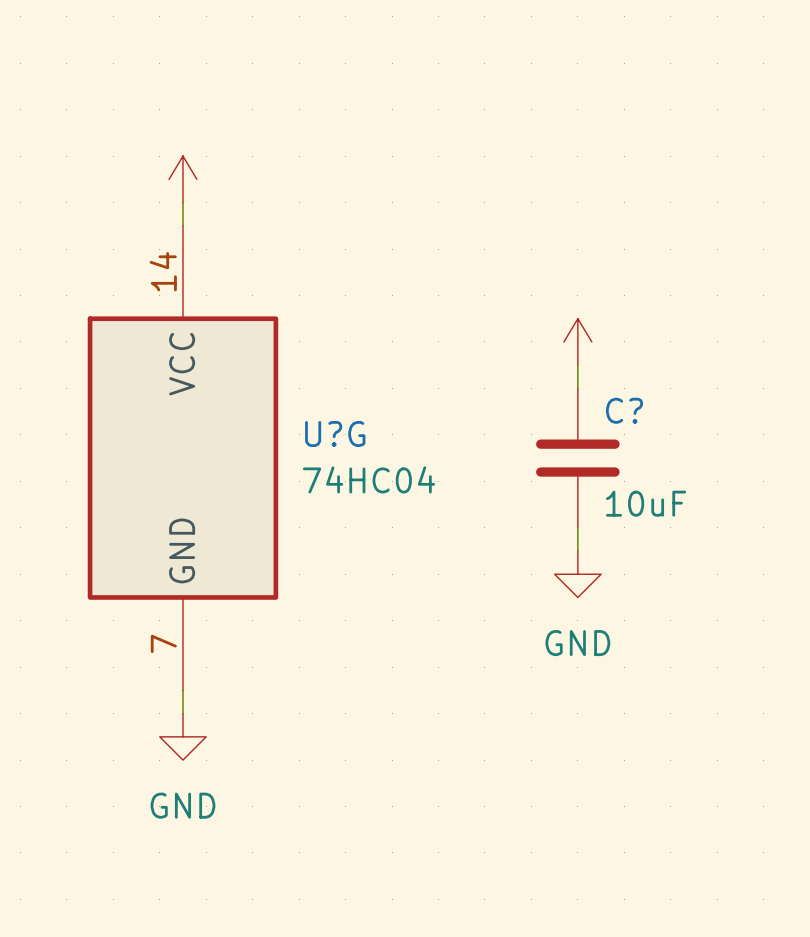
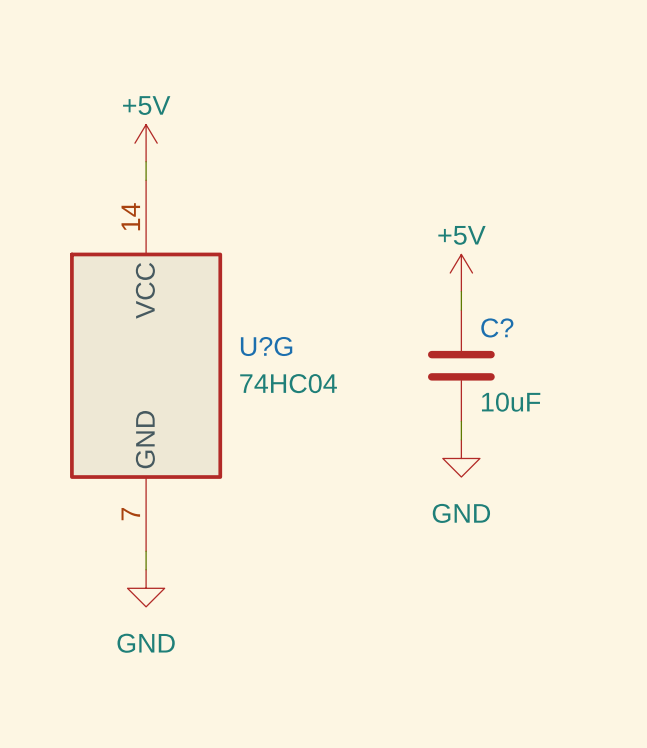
power symbol text: none -> +5V (146, 105)
power symbol text: none -> +5V (461, 235)

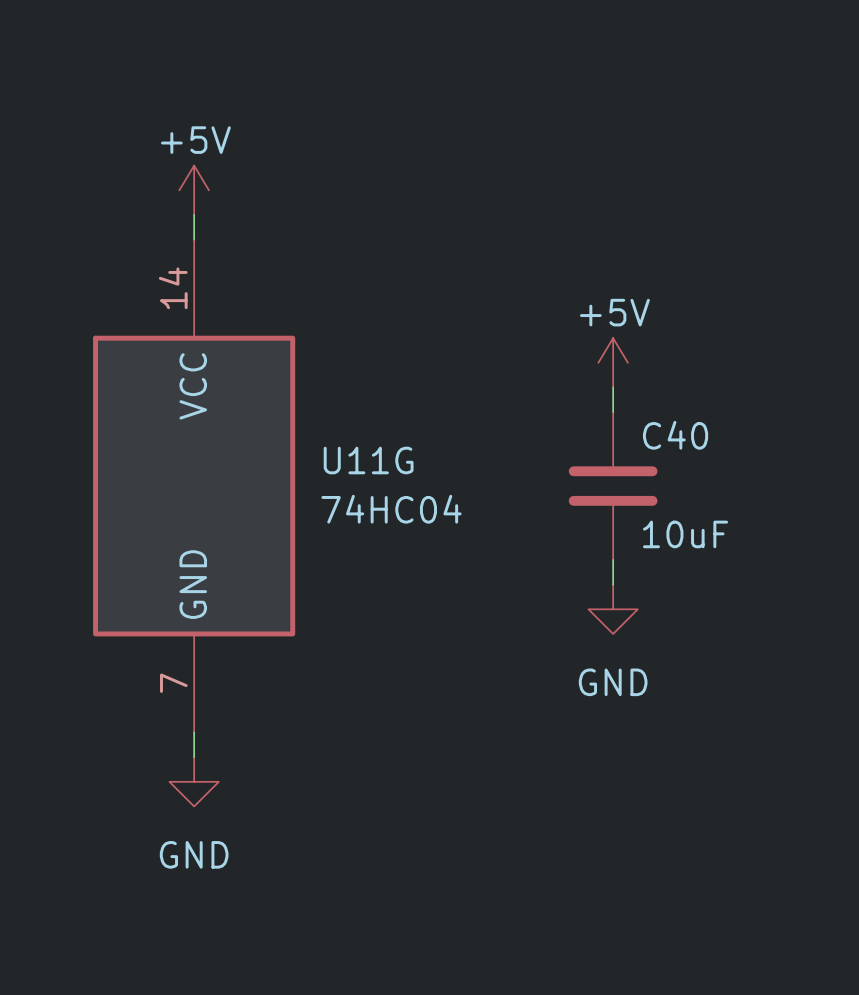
C? name: C? (497, 327) -> C40 (675, 435)
U?G name: U?G (266, 346) -> U11G (368, 460)

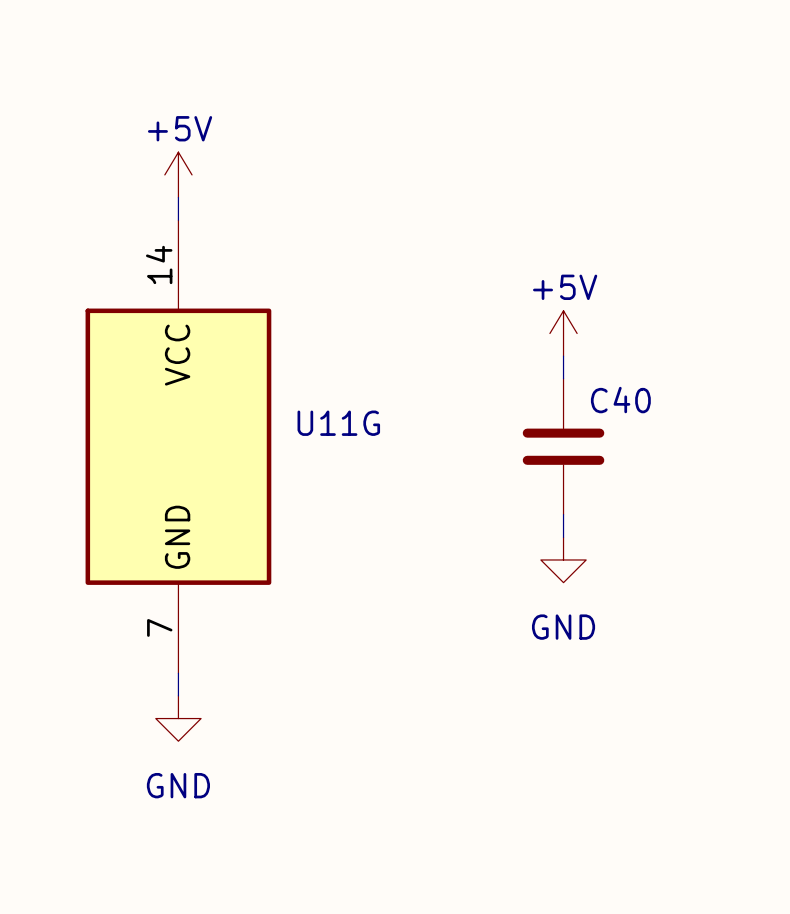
U11G value: 74HC04 (391, 509) -> none
C40 value: 10uF (685, 534) -> none

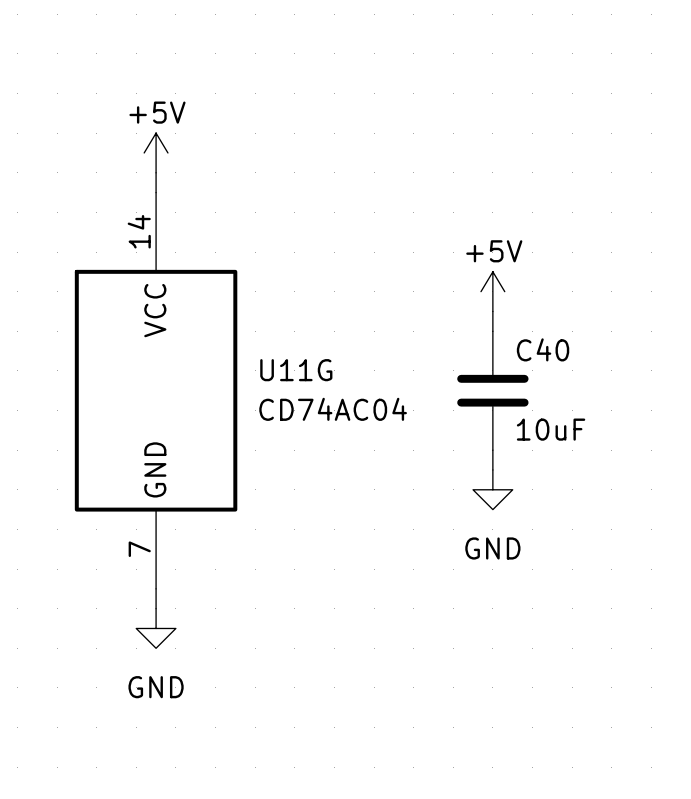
U11G value: none -> CD74AC04 (333, 409)
C40 value: none -> 10uF (551, 429)

